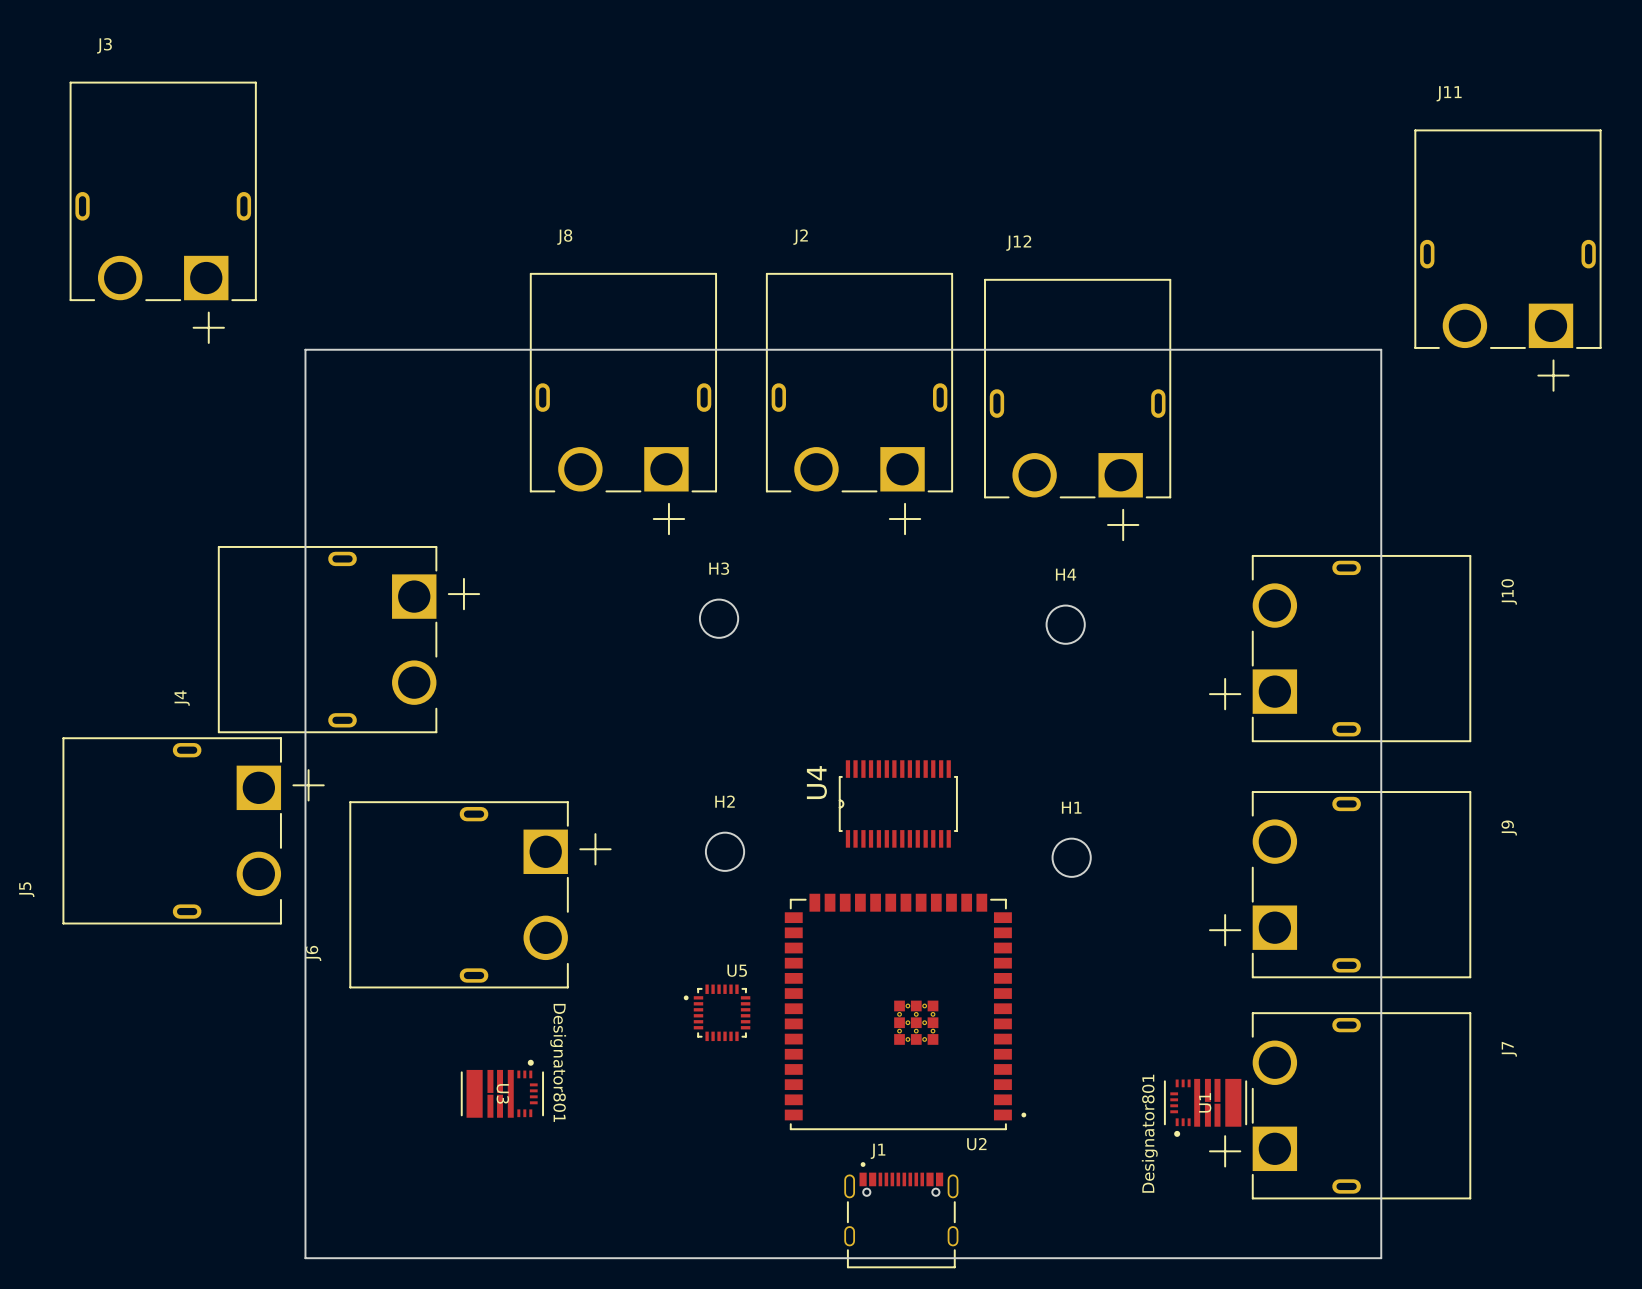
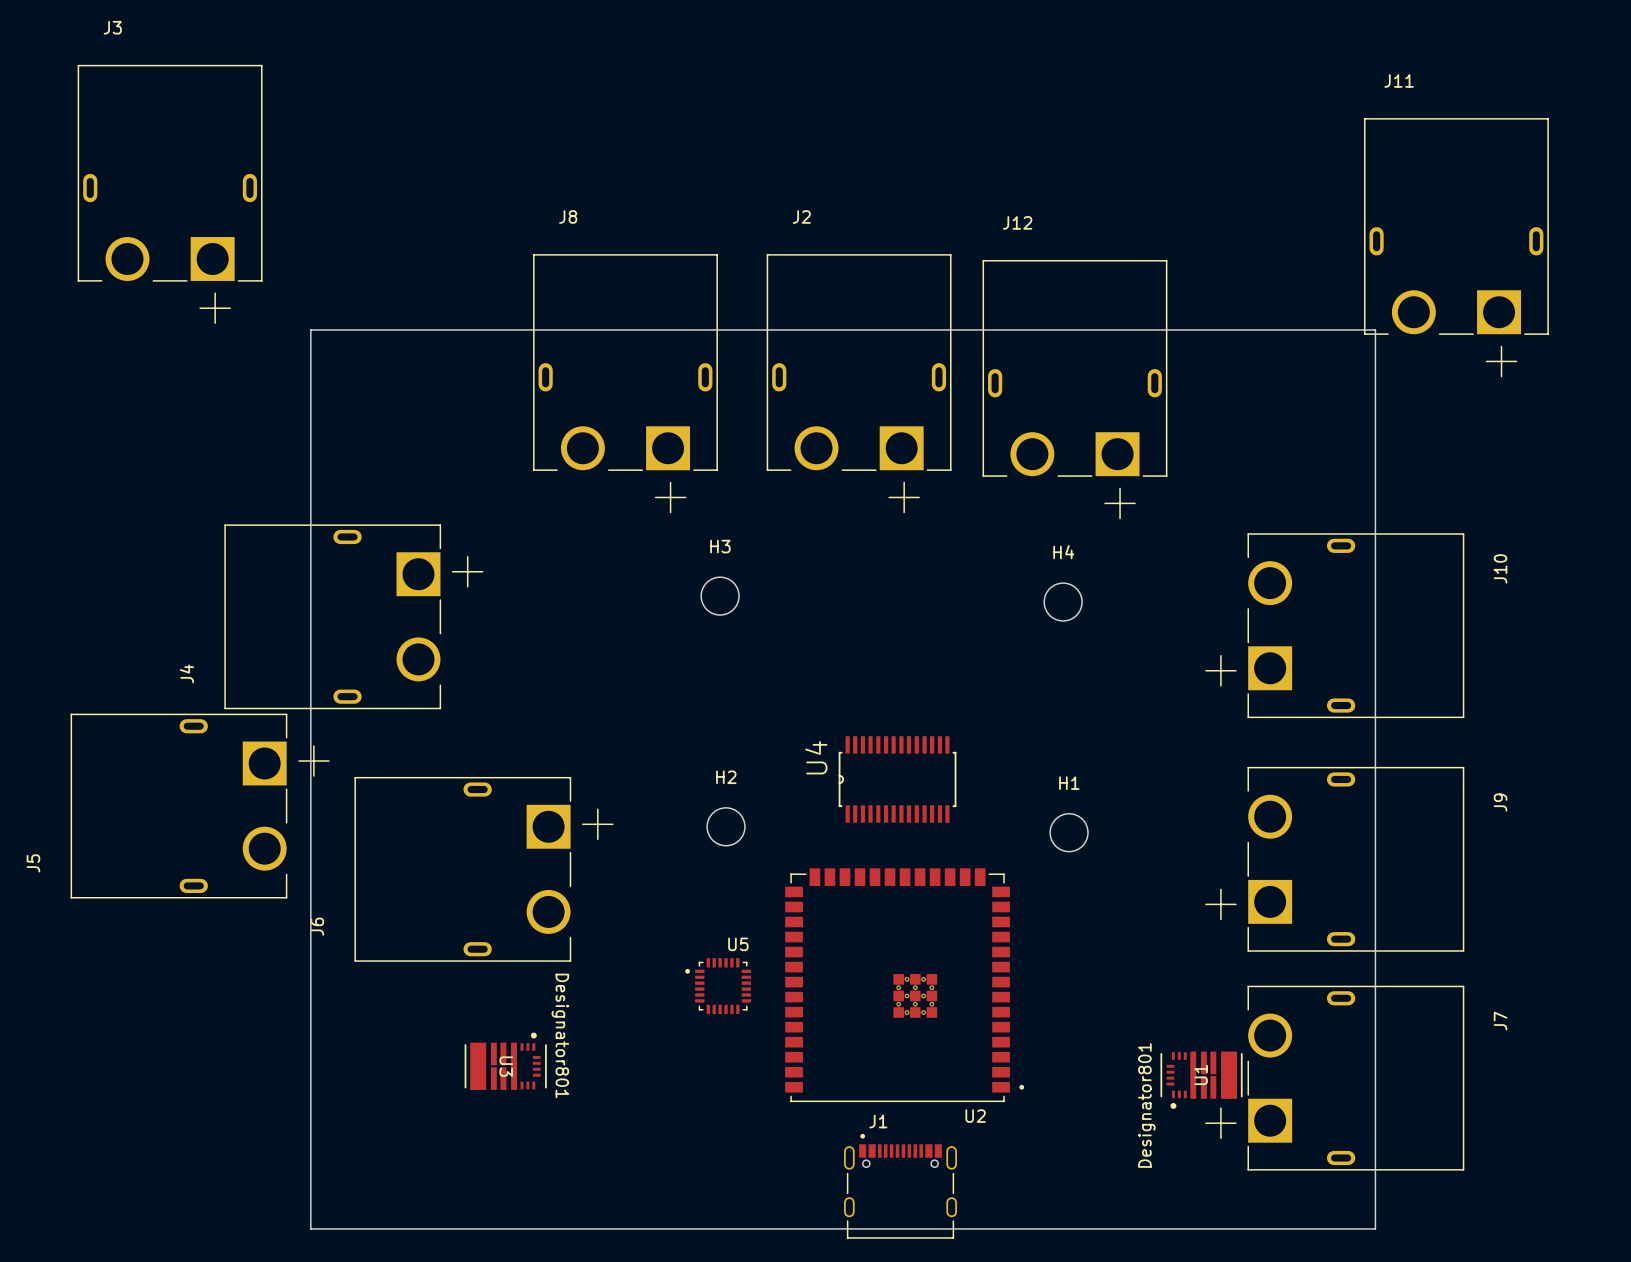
J11 position: (1507, 260) -> (1456, 247)

